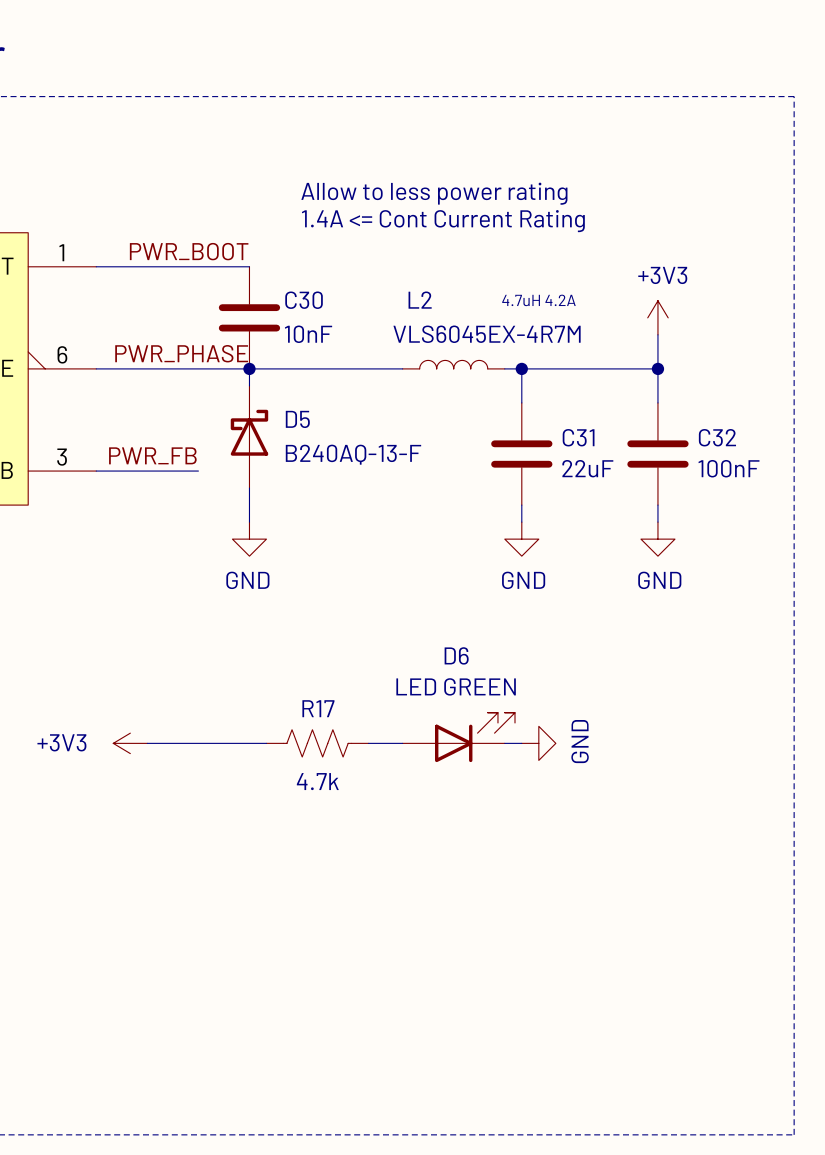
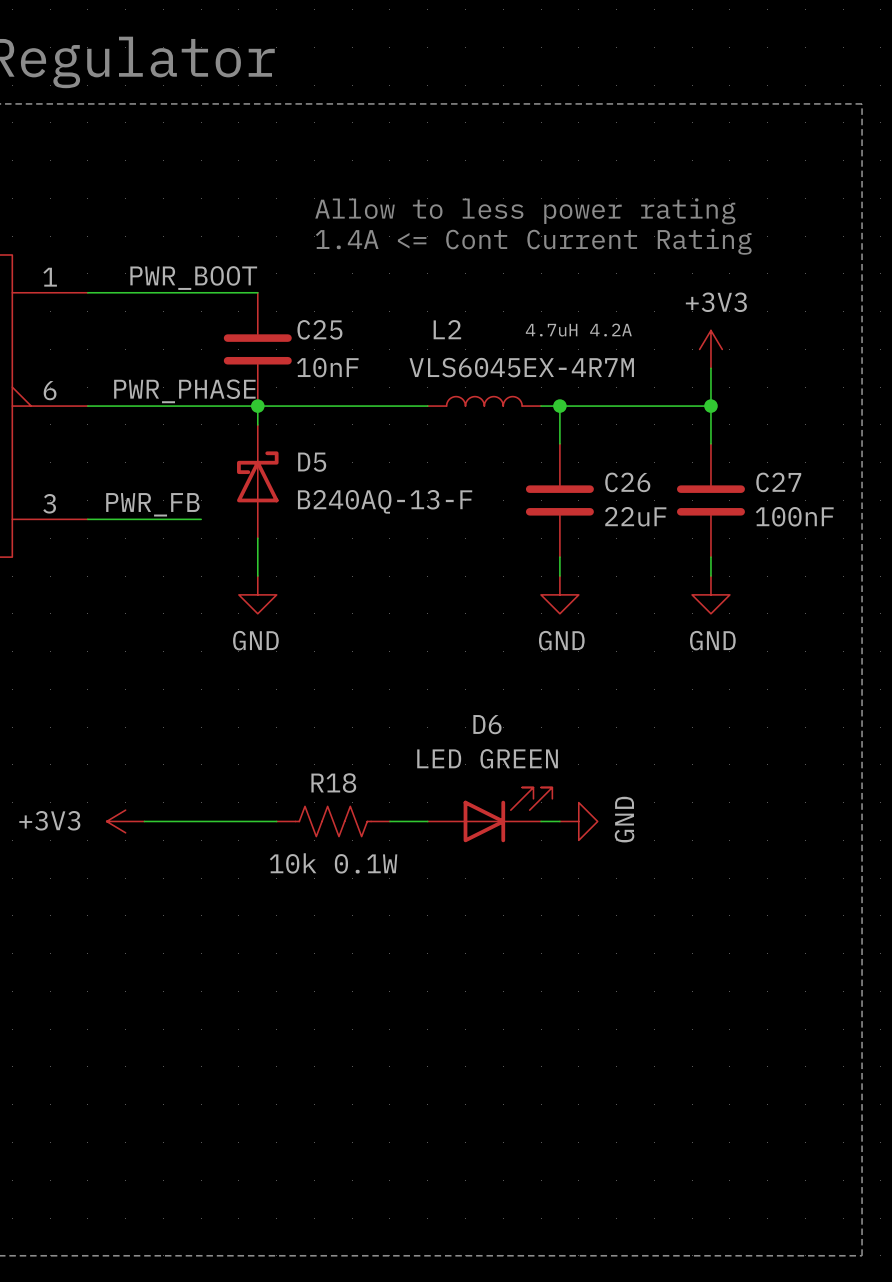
C30 name: C30 (304, 300) -> C25 (319, 329)
C31 name: C31 (578, 437) -> C26 (627, 482)
C32 name: C32 (717, 437) -> C27 (778, 482)
R17 name: R17 (318, 708) -> R18 (333, 783)
R17 value: 4.7k (317, 781) -> 10k 0.1W (333, 863)

